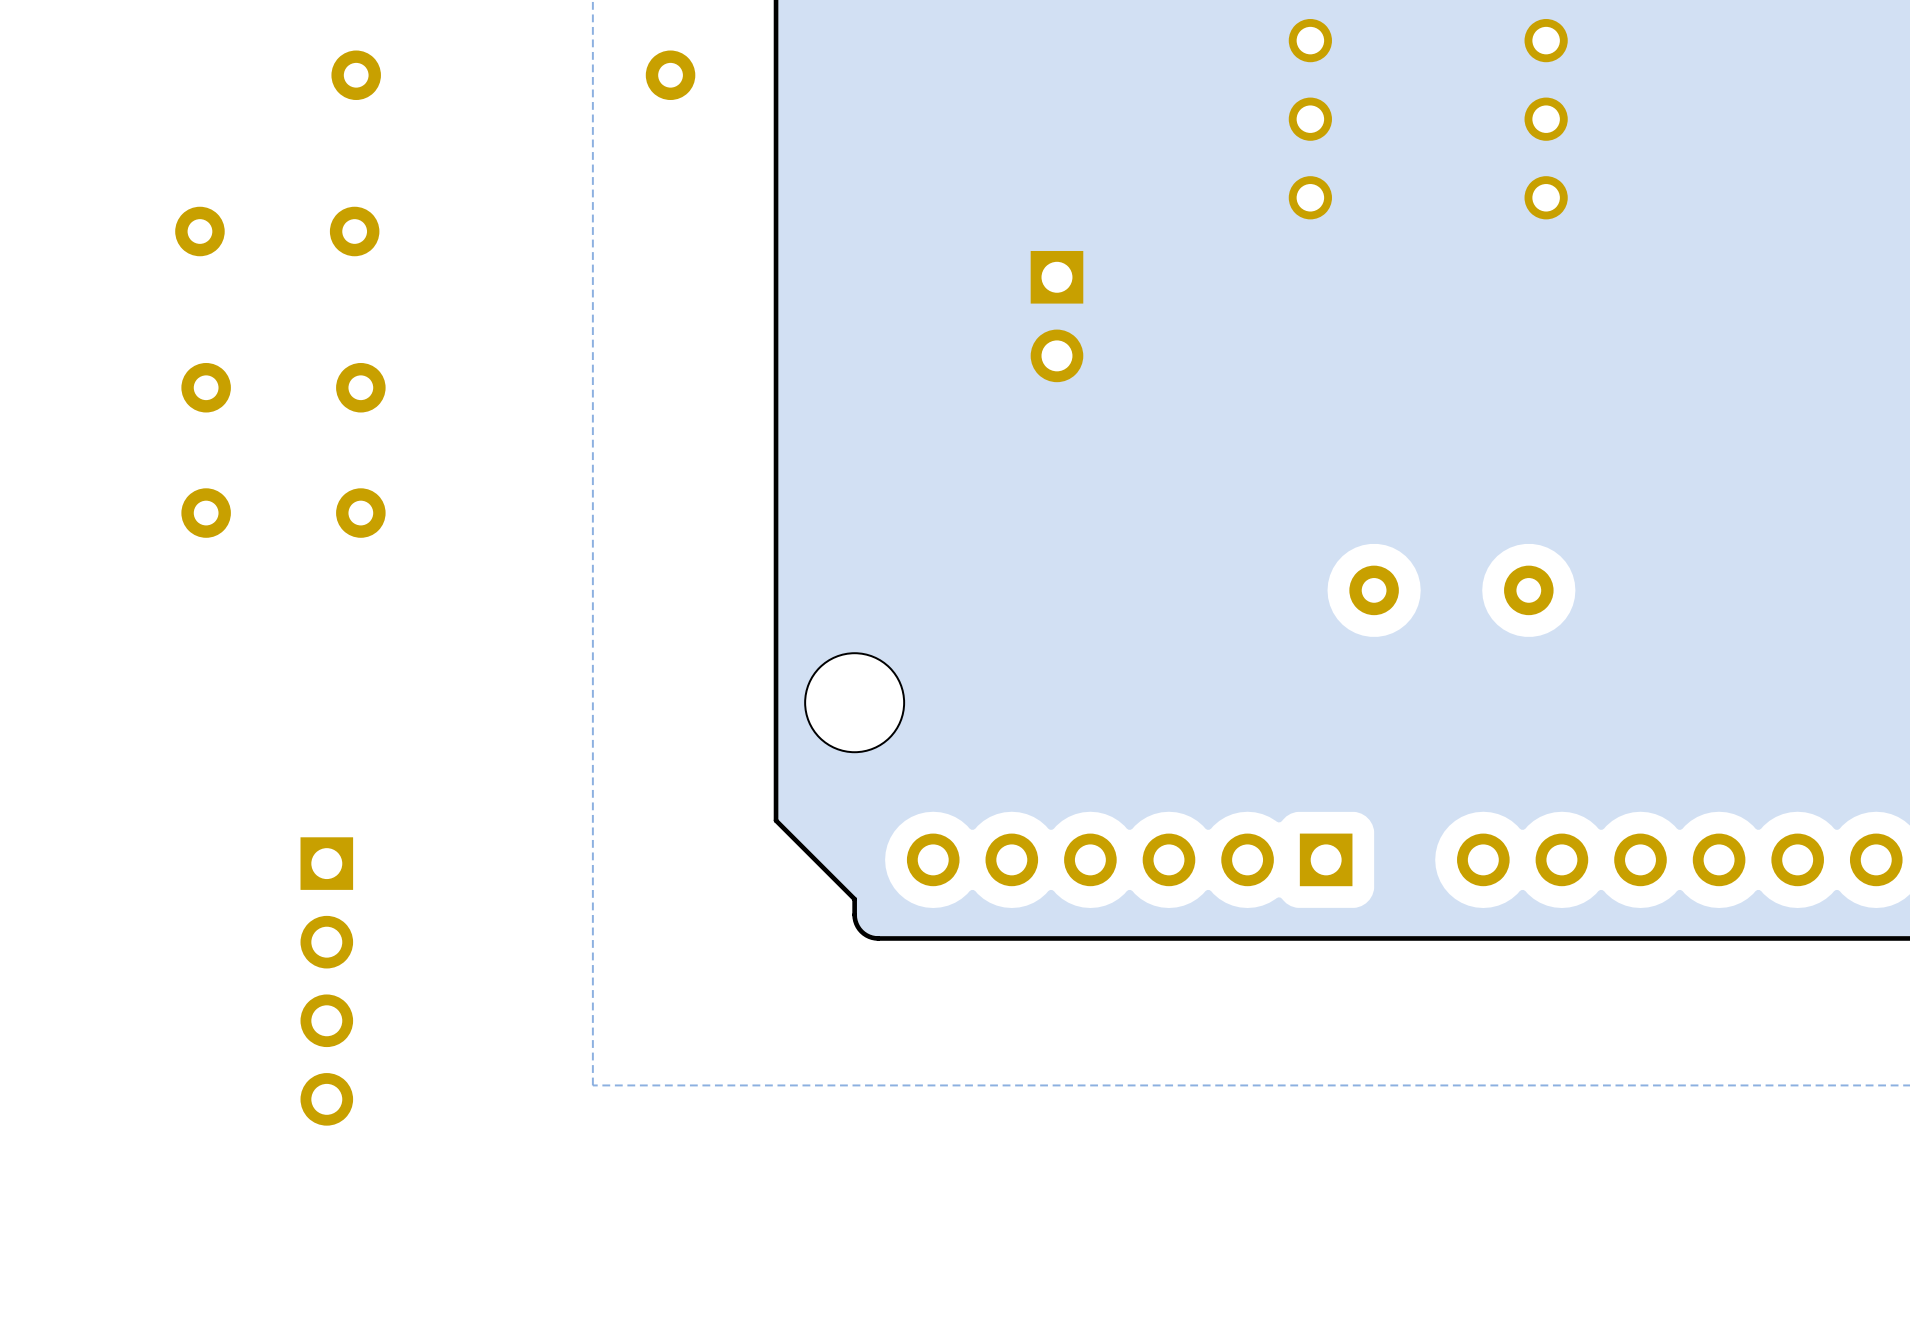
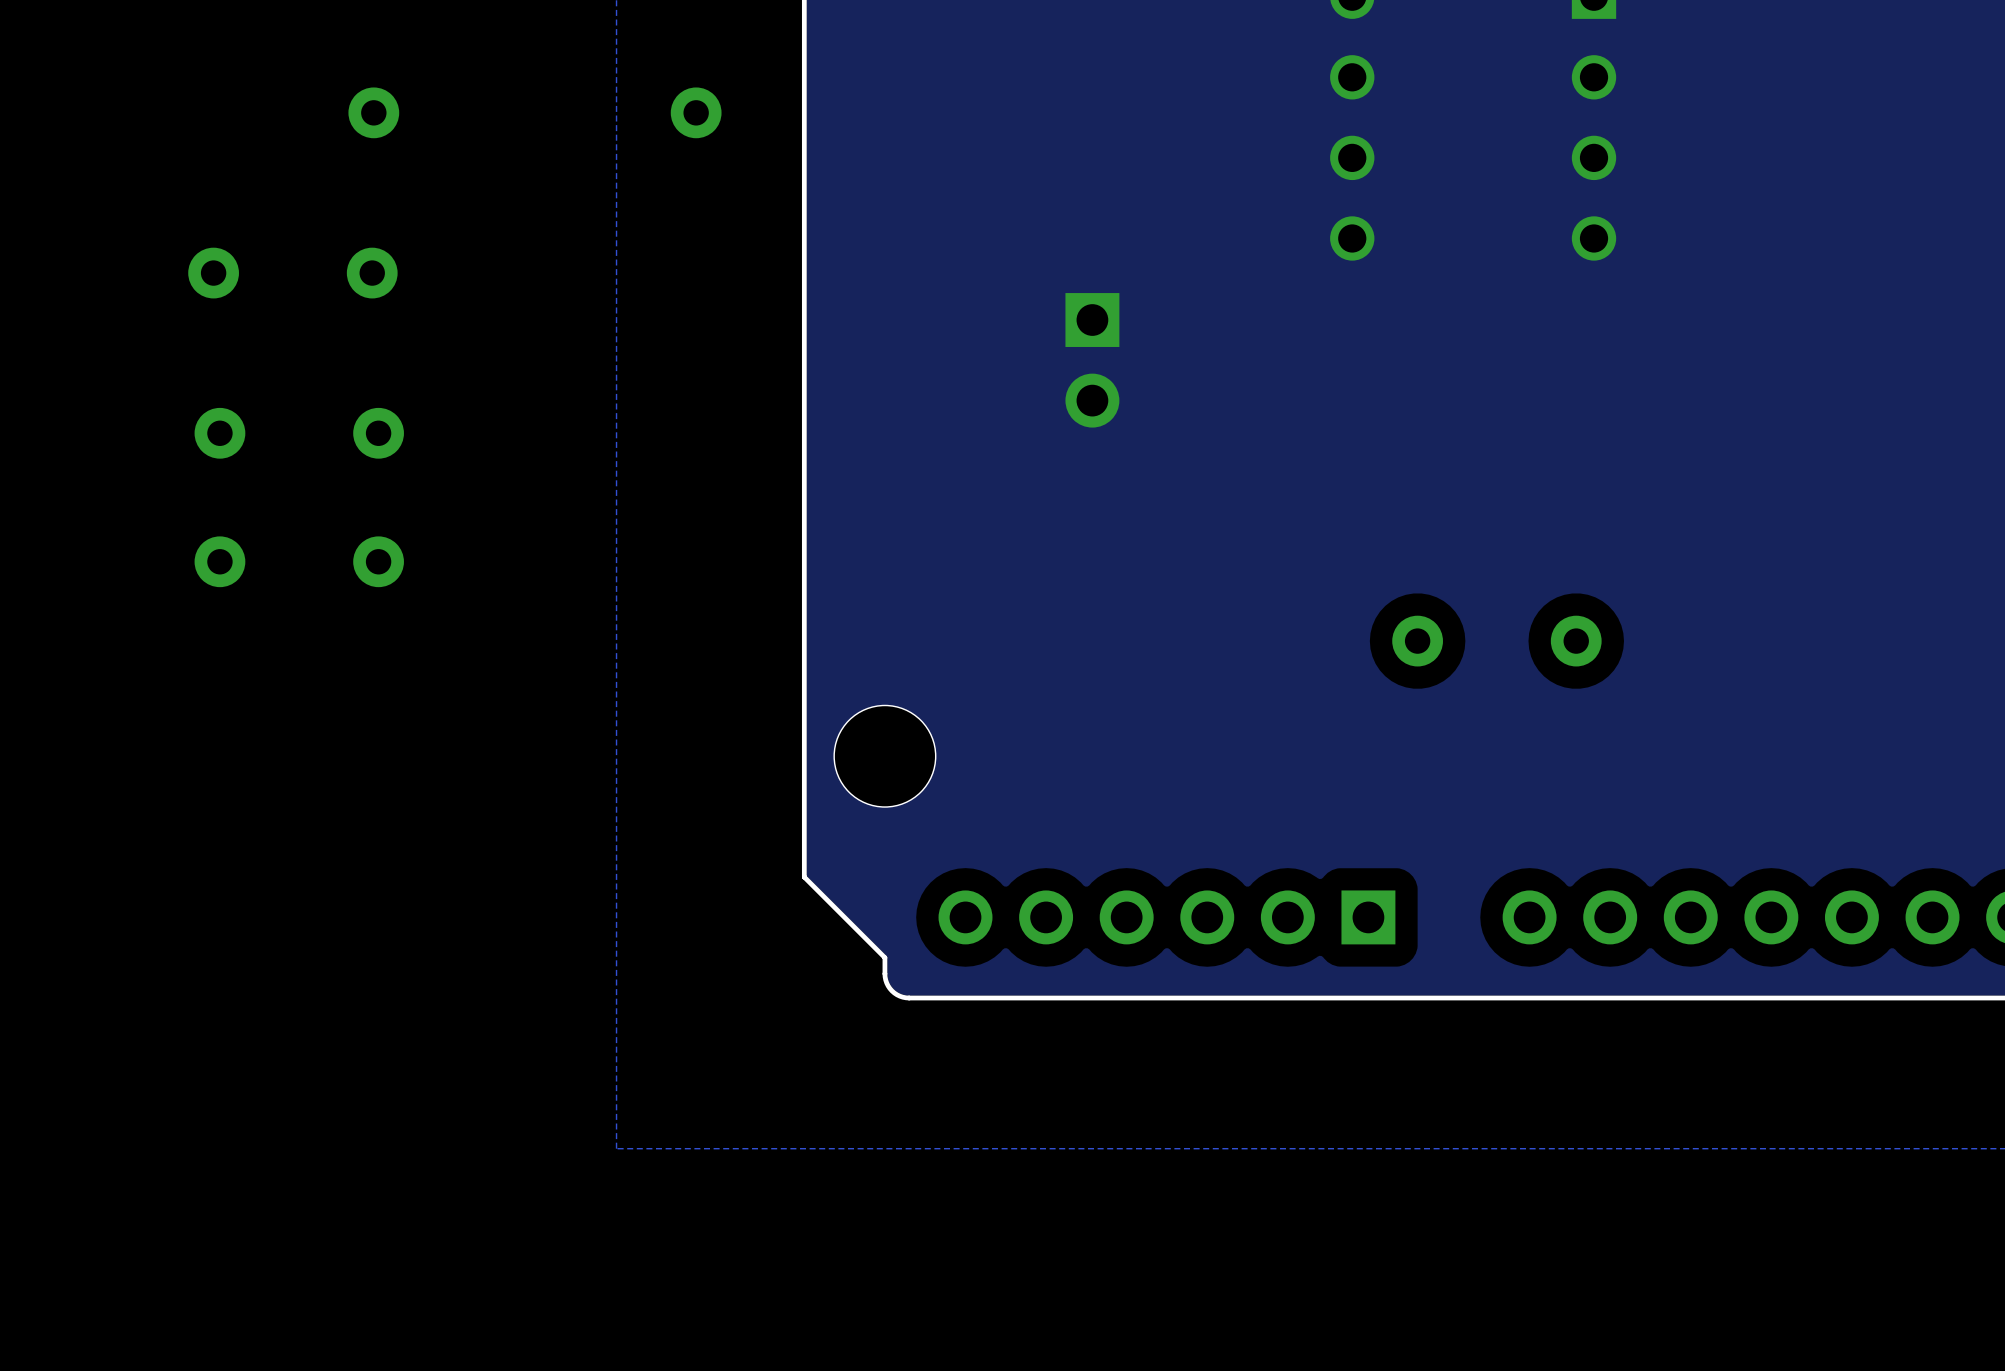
part: (326, 981) -> none

